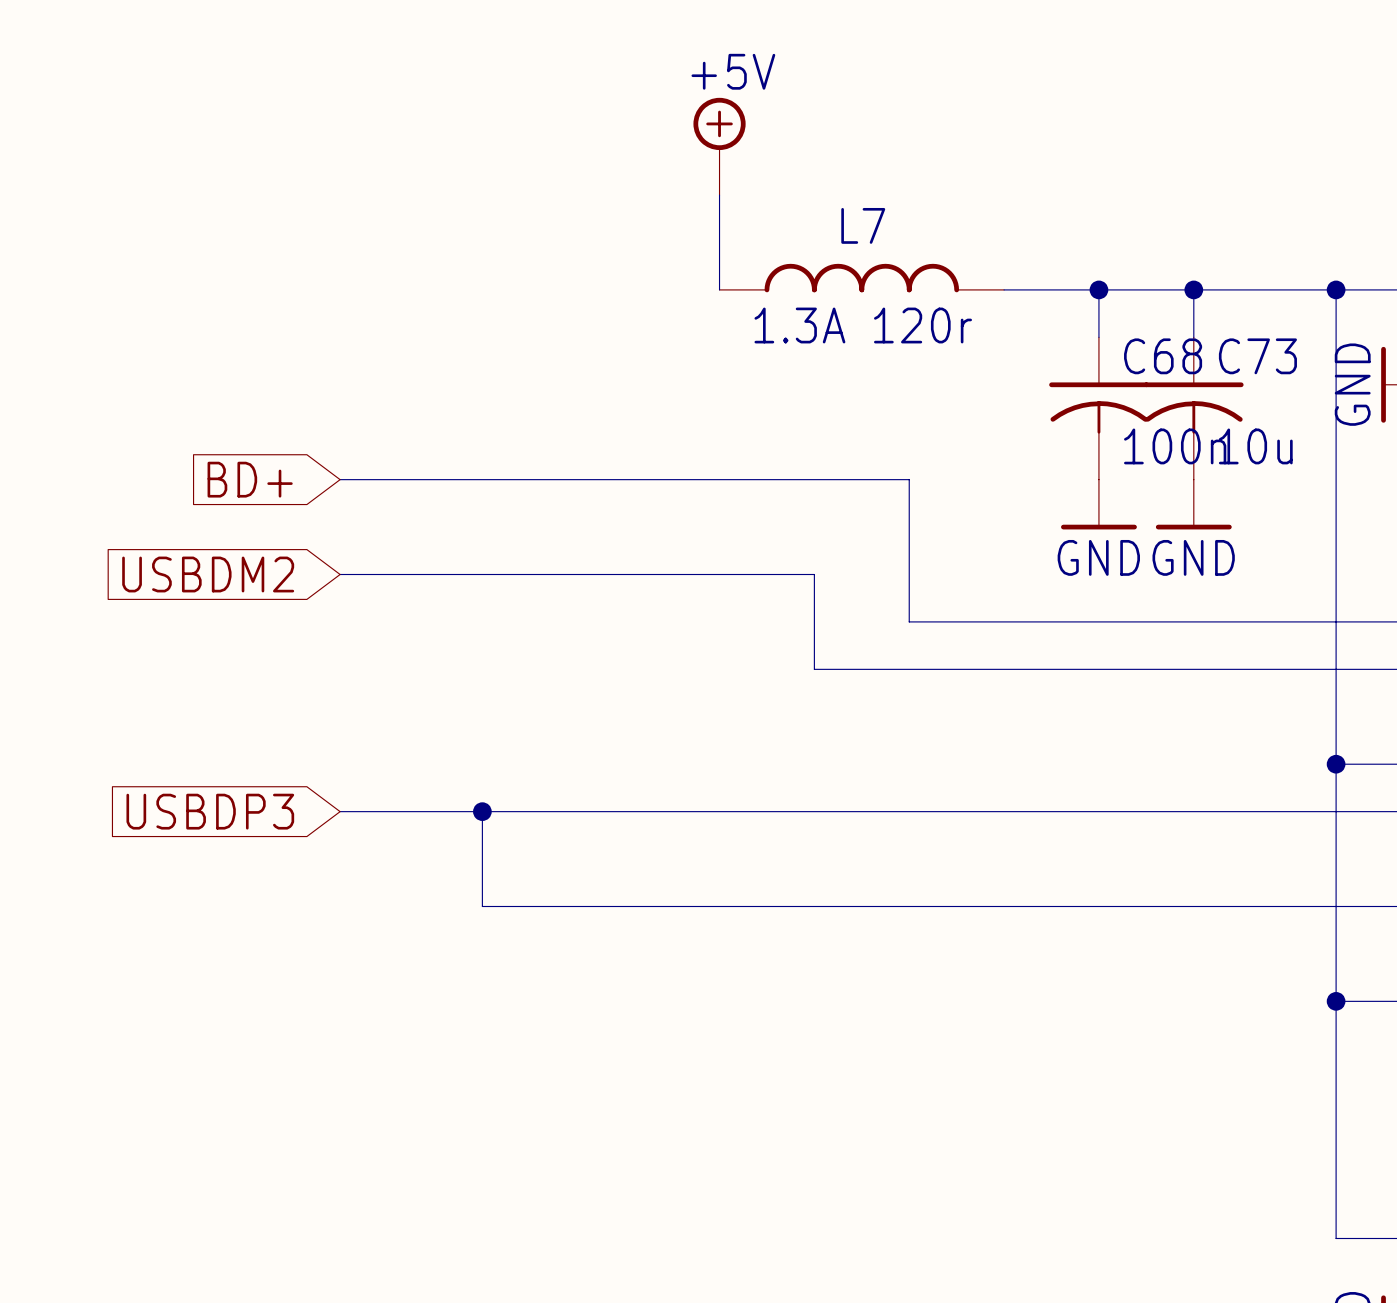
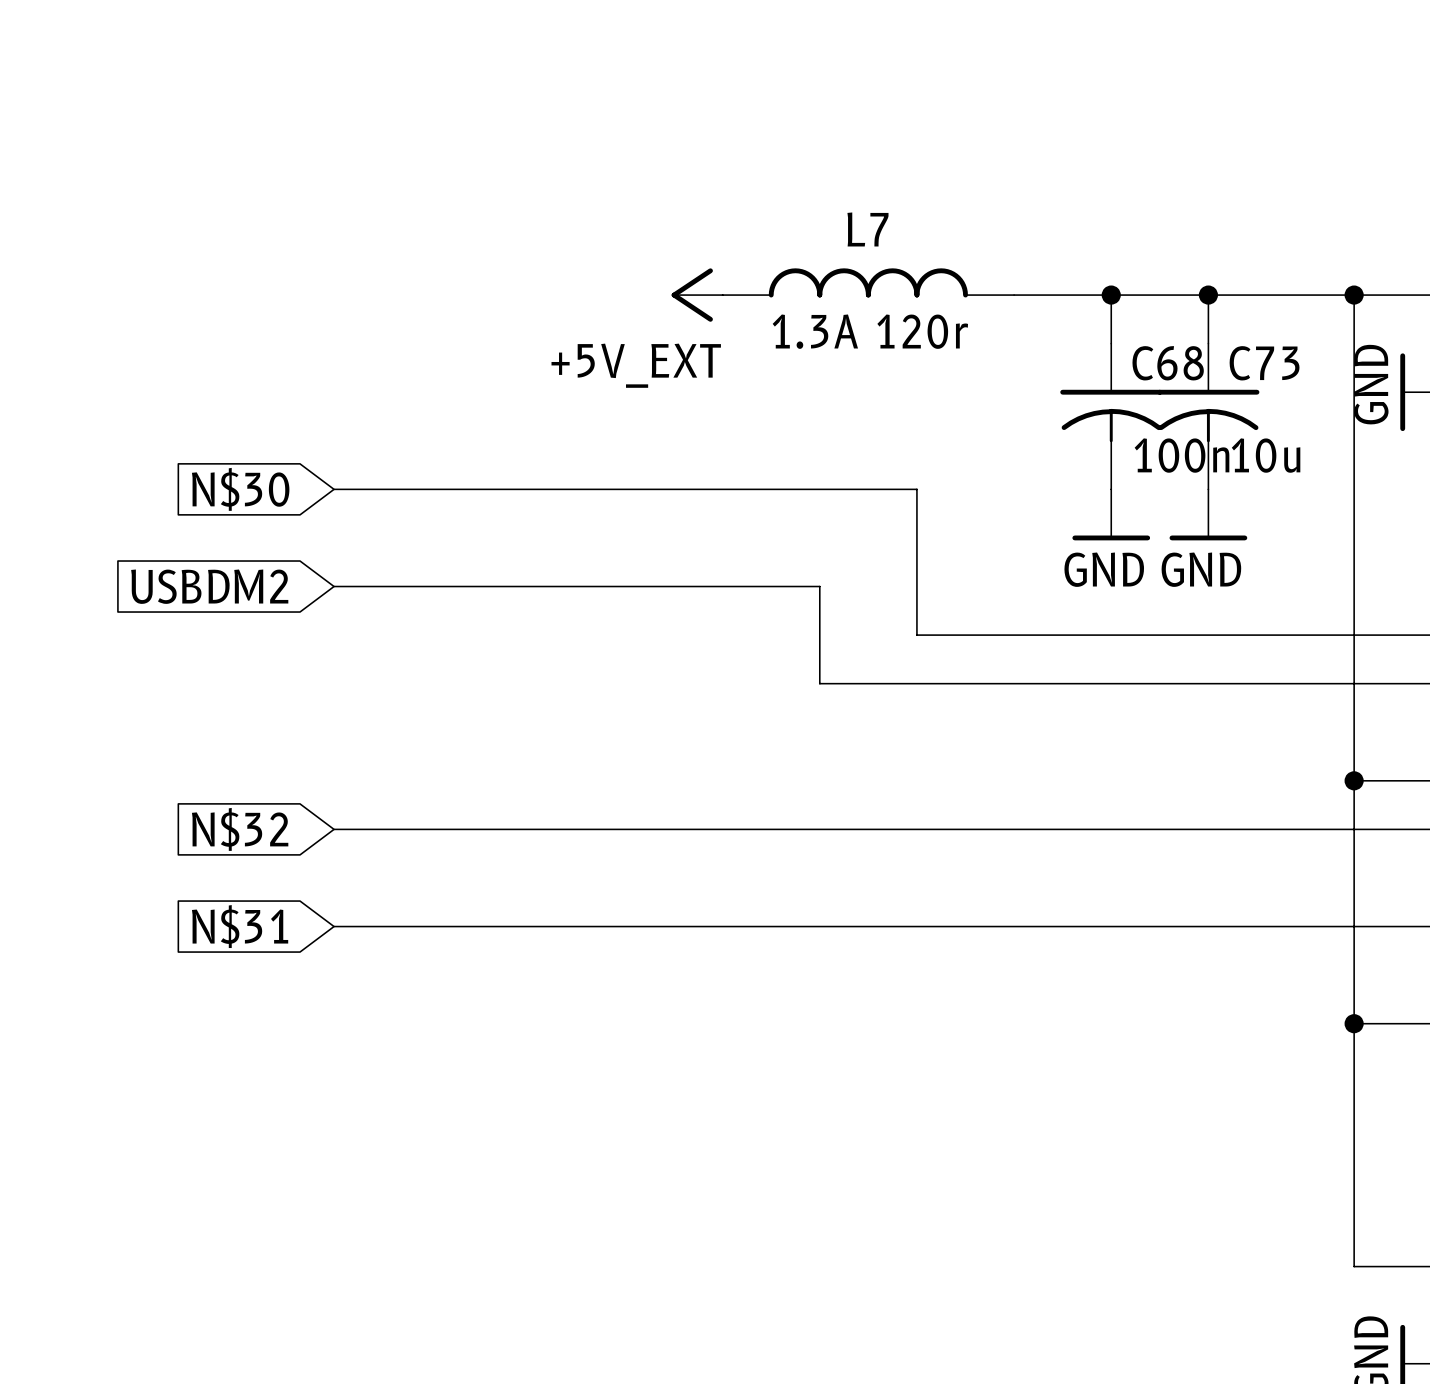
power symbol: +5V (719, 146) -> none
wire: (719, 195) (719, 289) -> none
power symbol: none -> +5V_EXT (697, 295)
global label: BD+ (250, 479) -> N$30 (240, 489)
global label: USBDP3 (210, 811) -> N$32 (240, 829)
wire: (482, 811) (482, 906) -> (334, 926) (479, 926)
junction: (482, 811) -> none
global label: none -> N$31 (240, 926)

